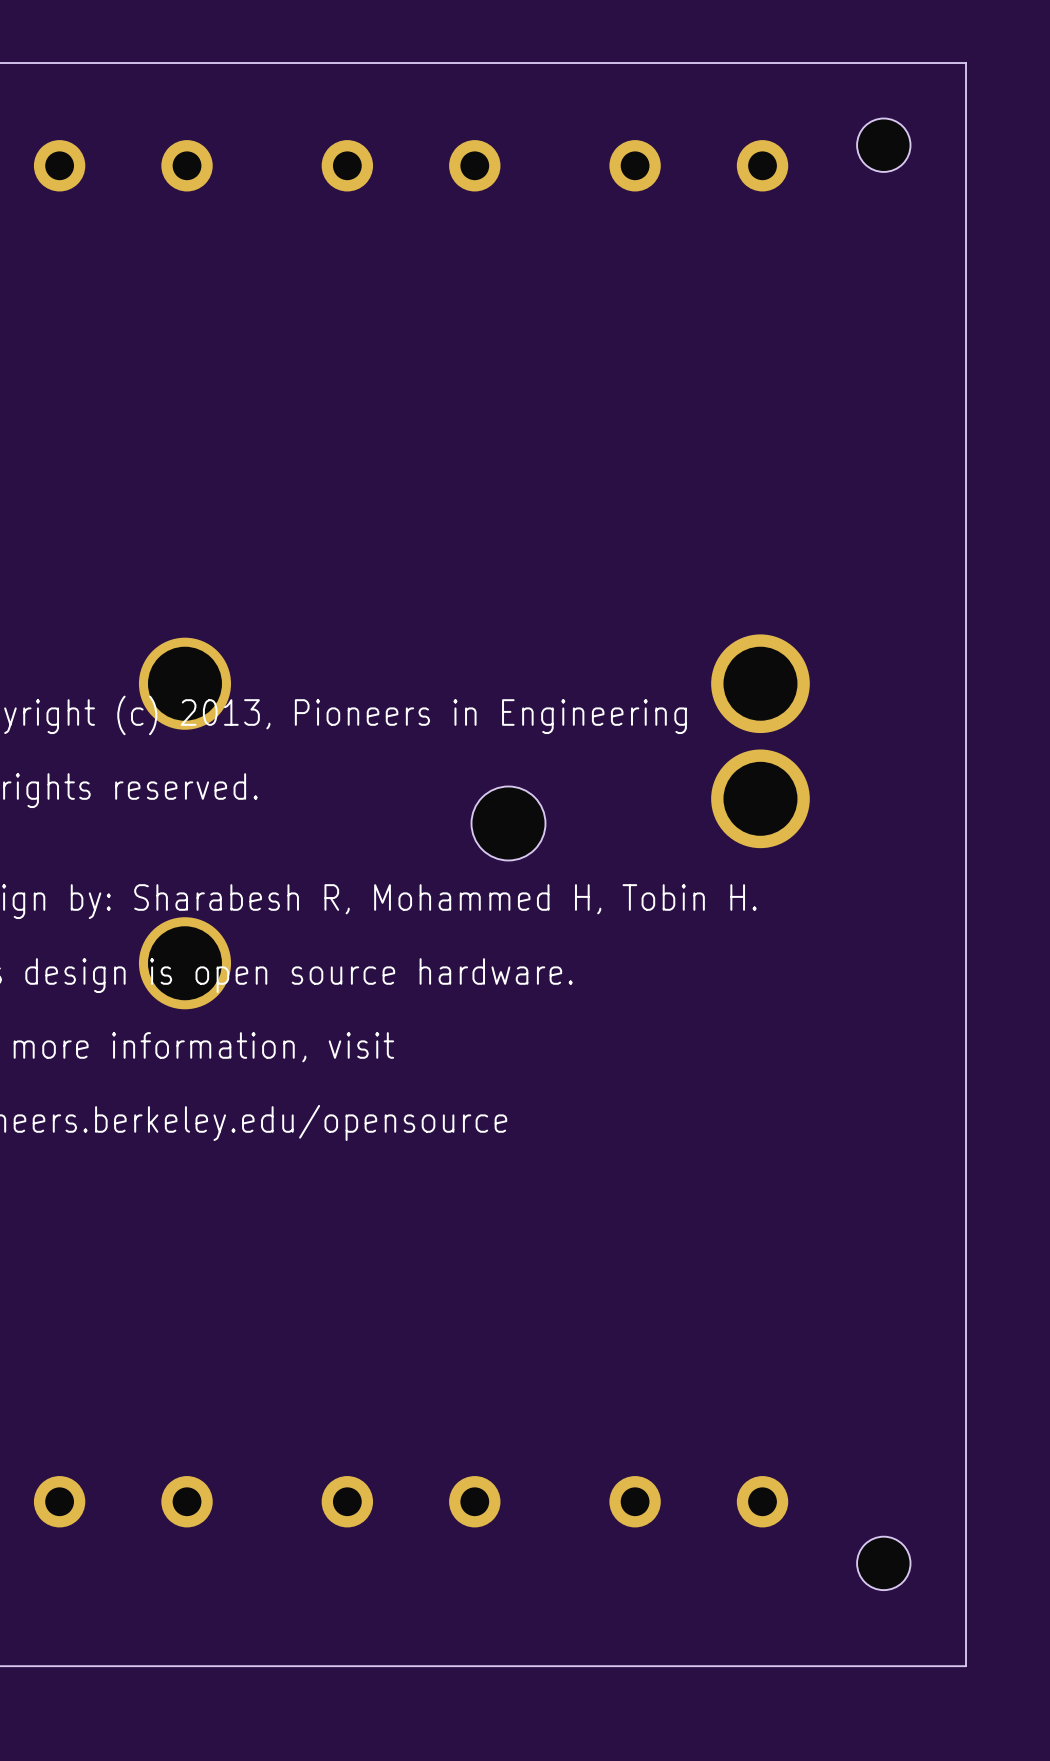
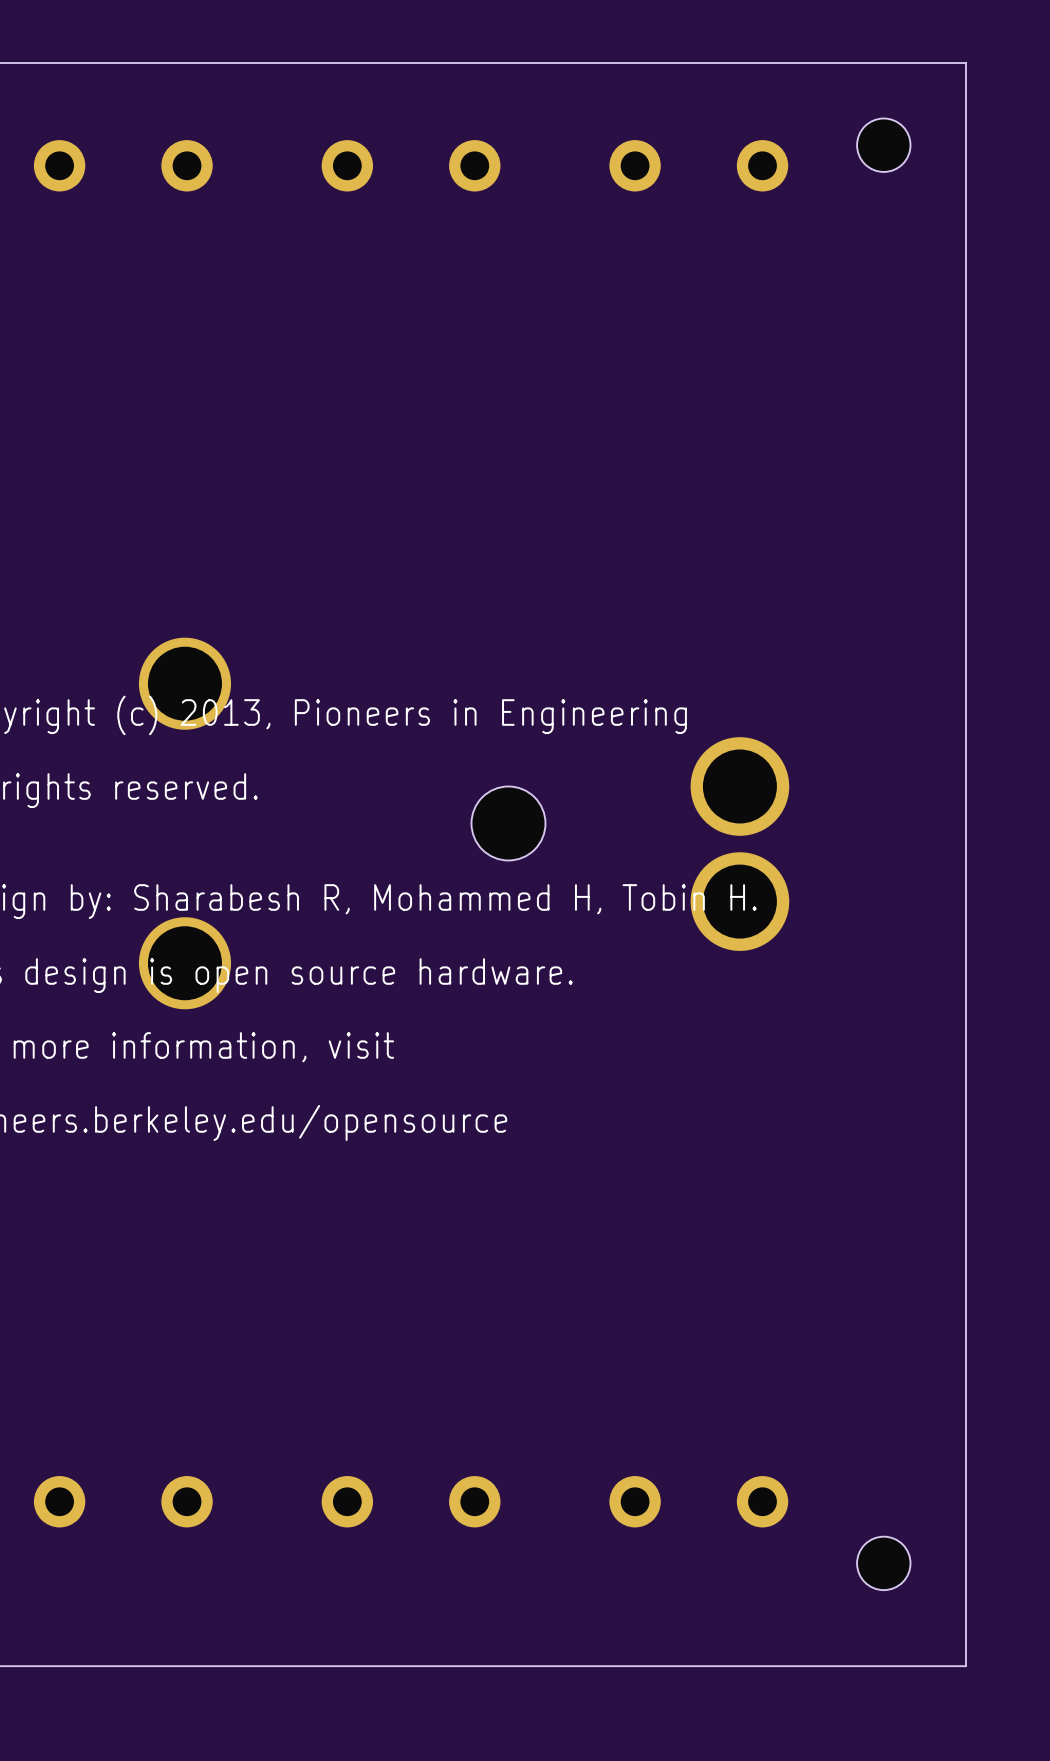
part position: (760, 741) -> (739, 844)

